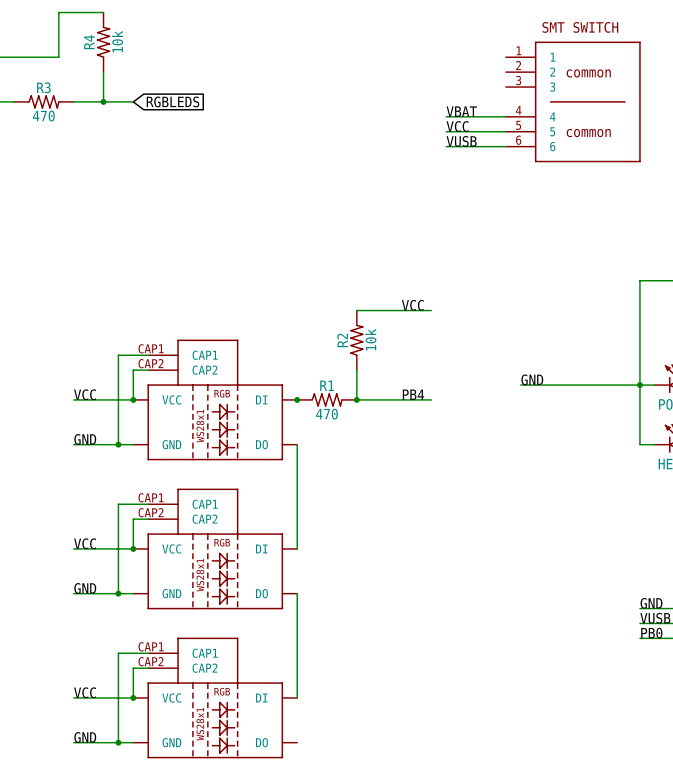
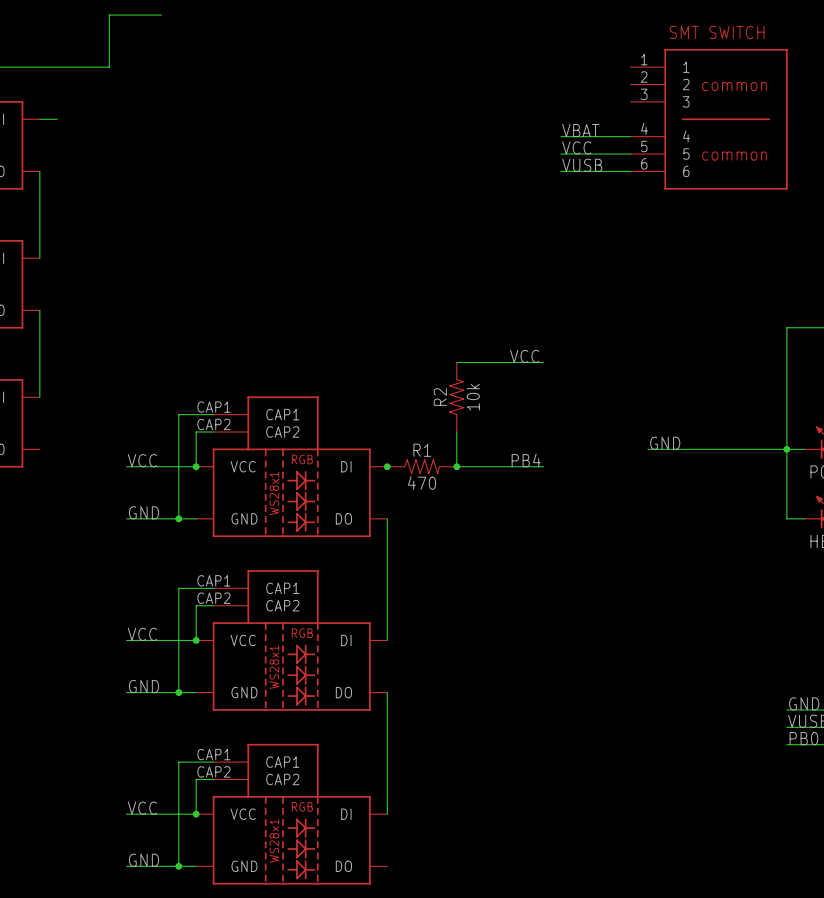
R4: 10k (103, 42) -> none
wire: (103, 72) (103, 101) -> none
R3: 470 (43, 101) -> none
wire: (73, 101) (133, 101) -> none
junction: (103, 101) -> none
global label: RGBLEDS (173, 101) -> none

